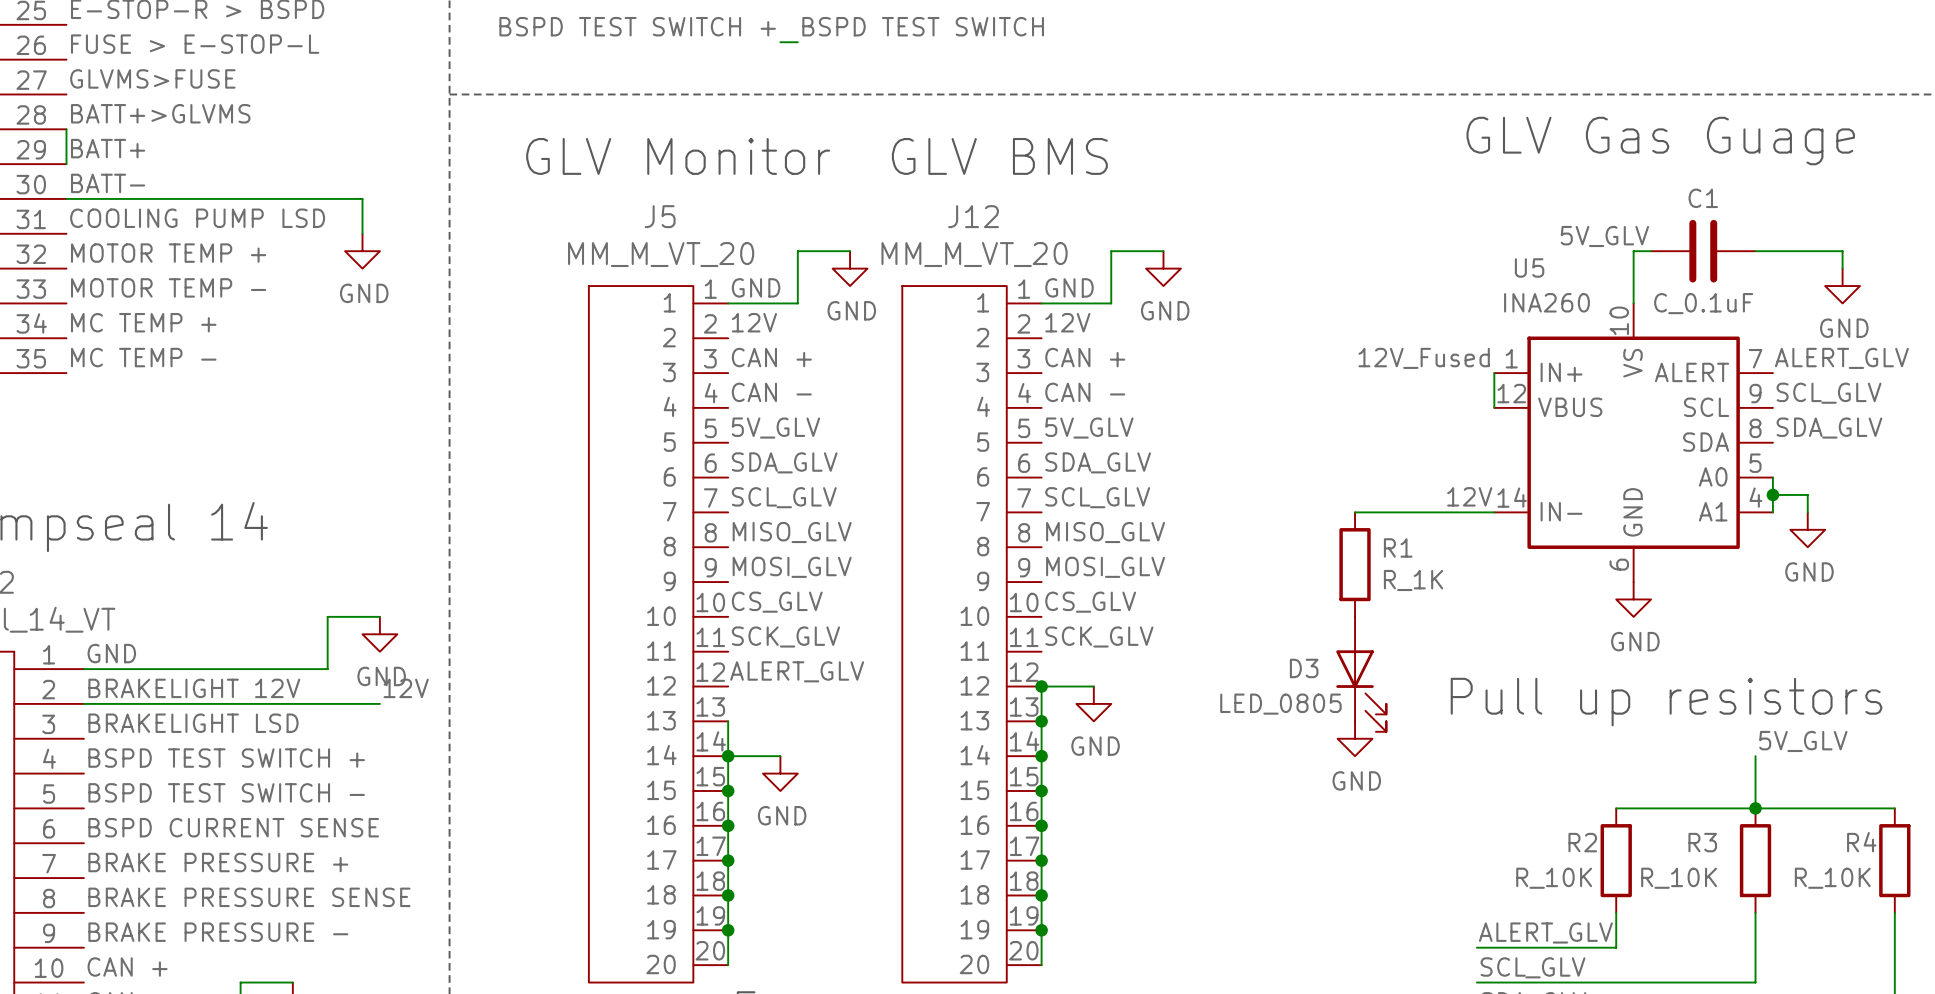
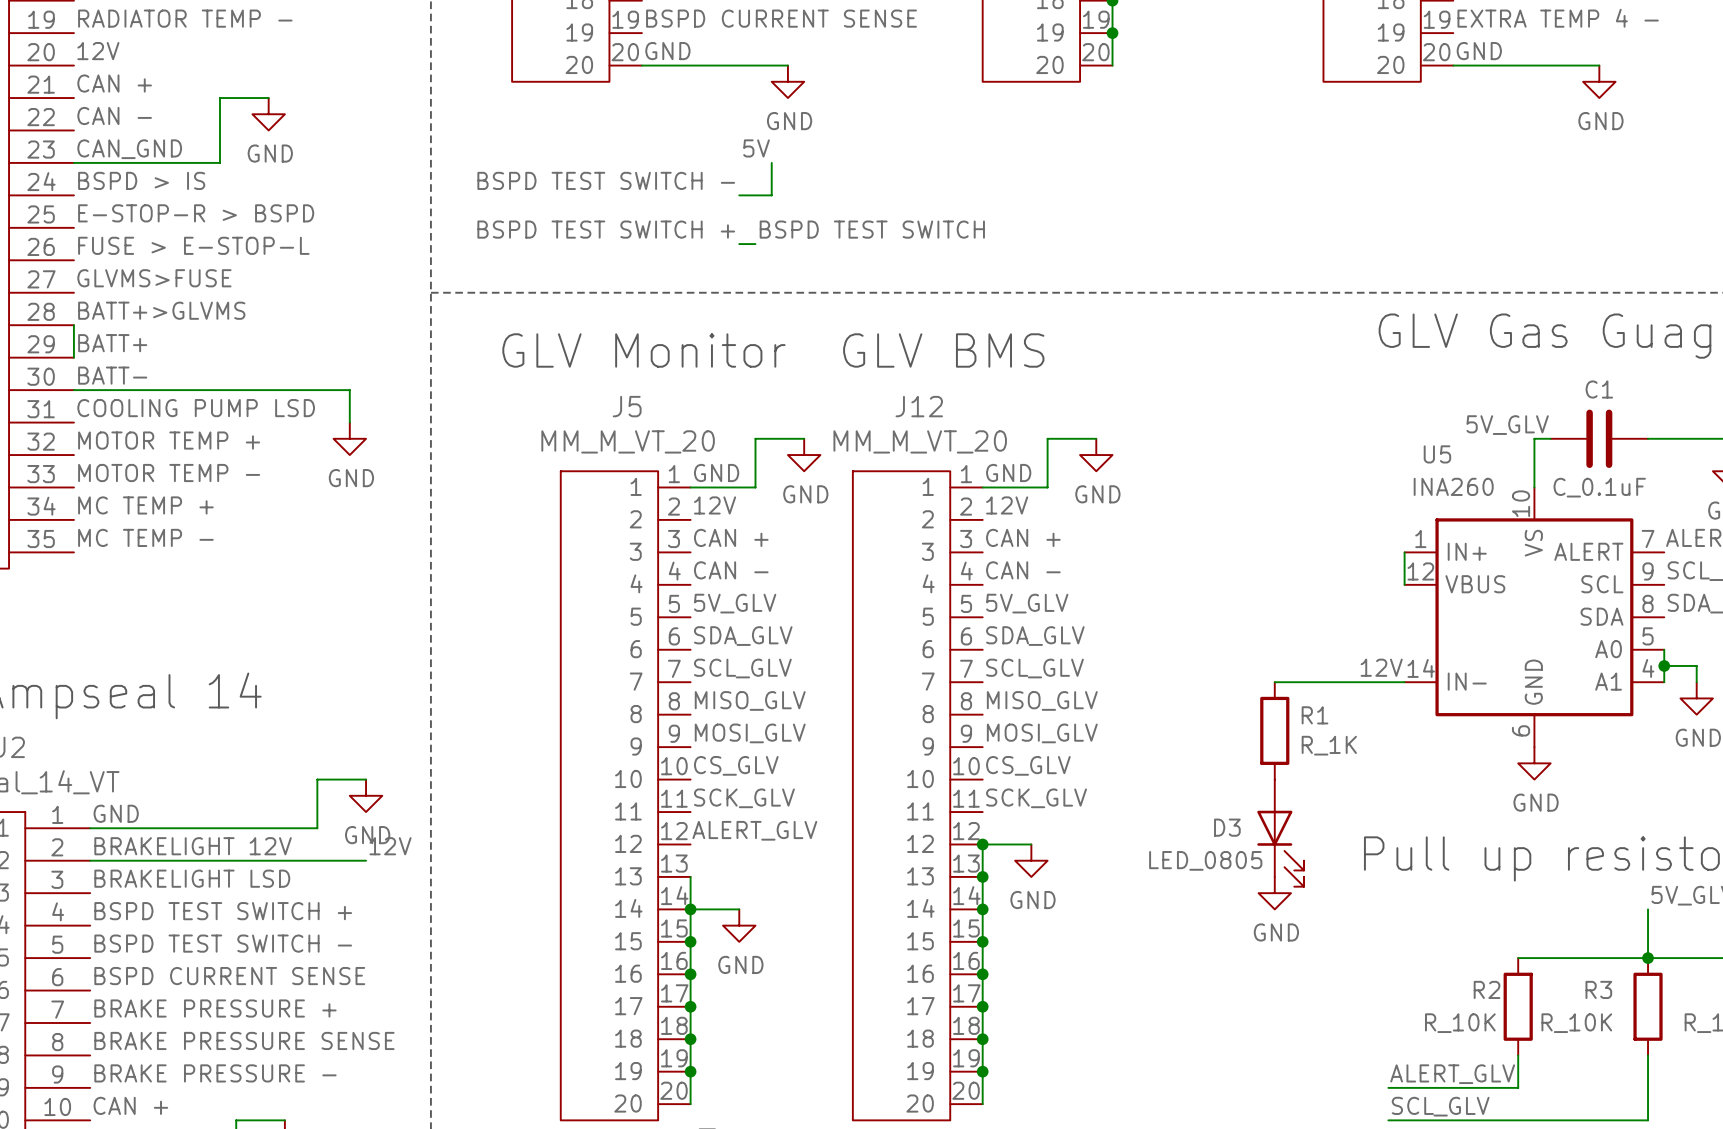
label: 12V_Fused (1424, 358) -> none

